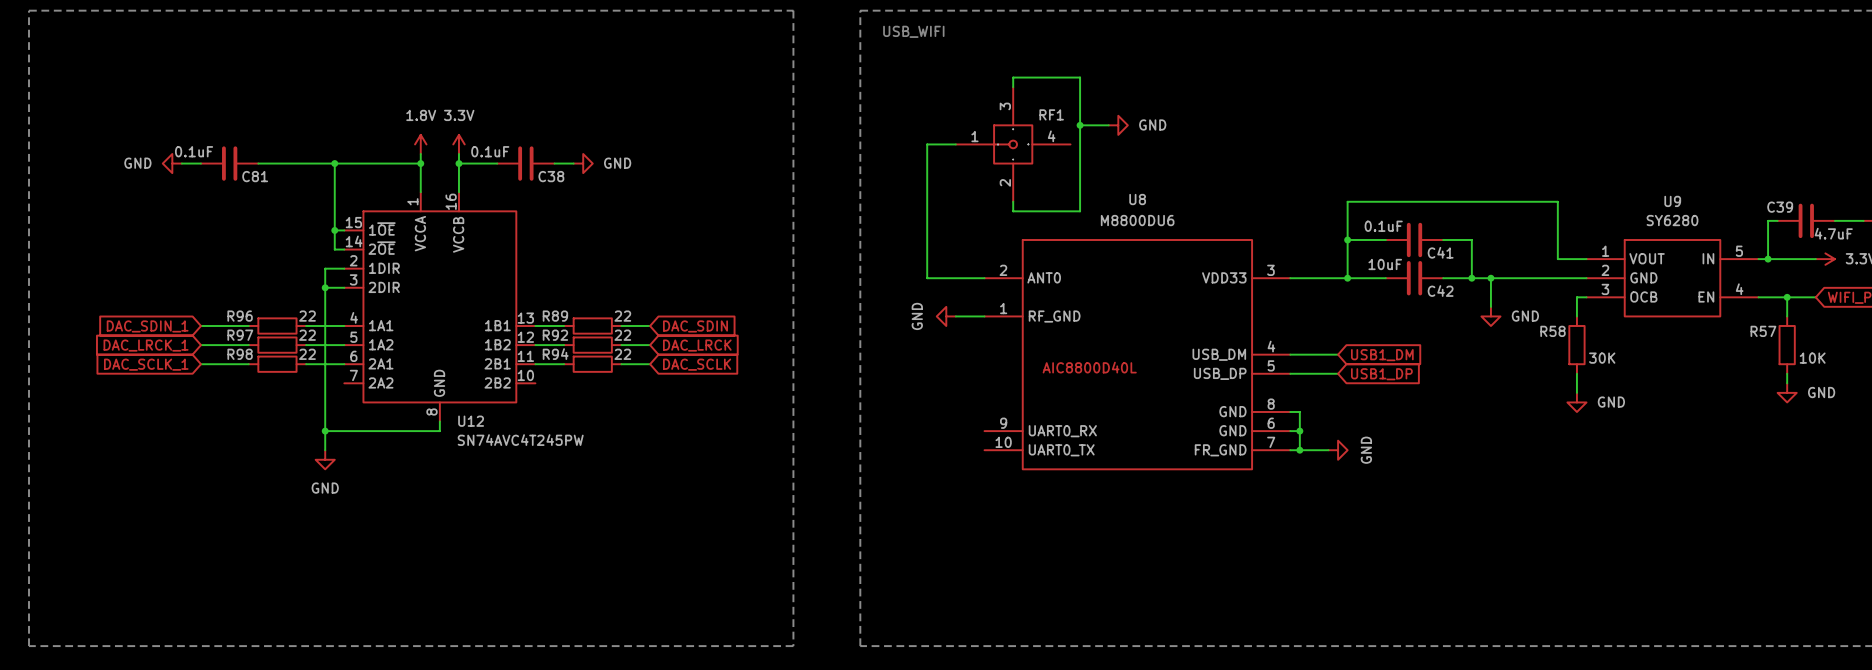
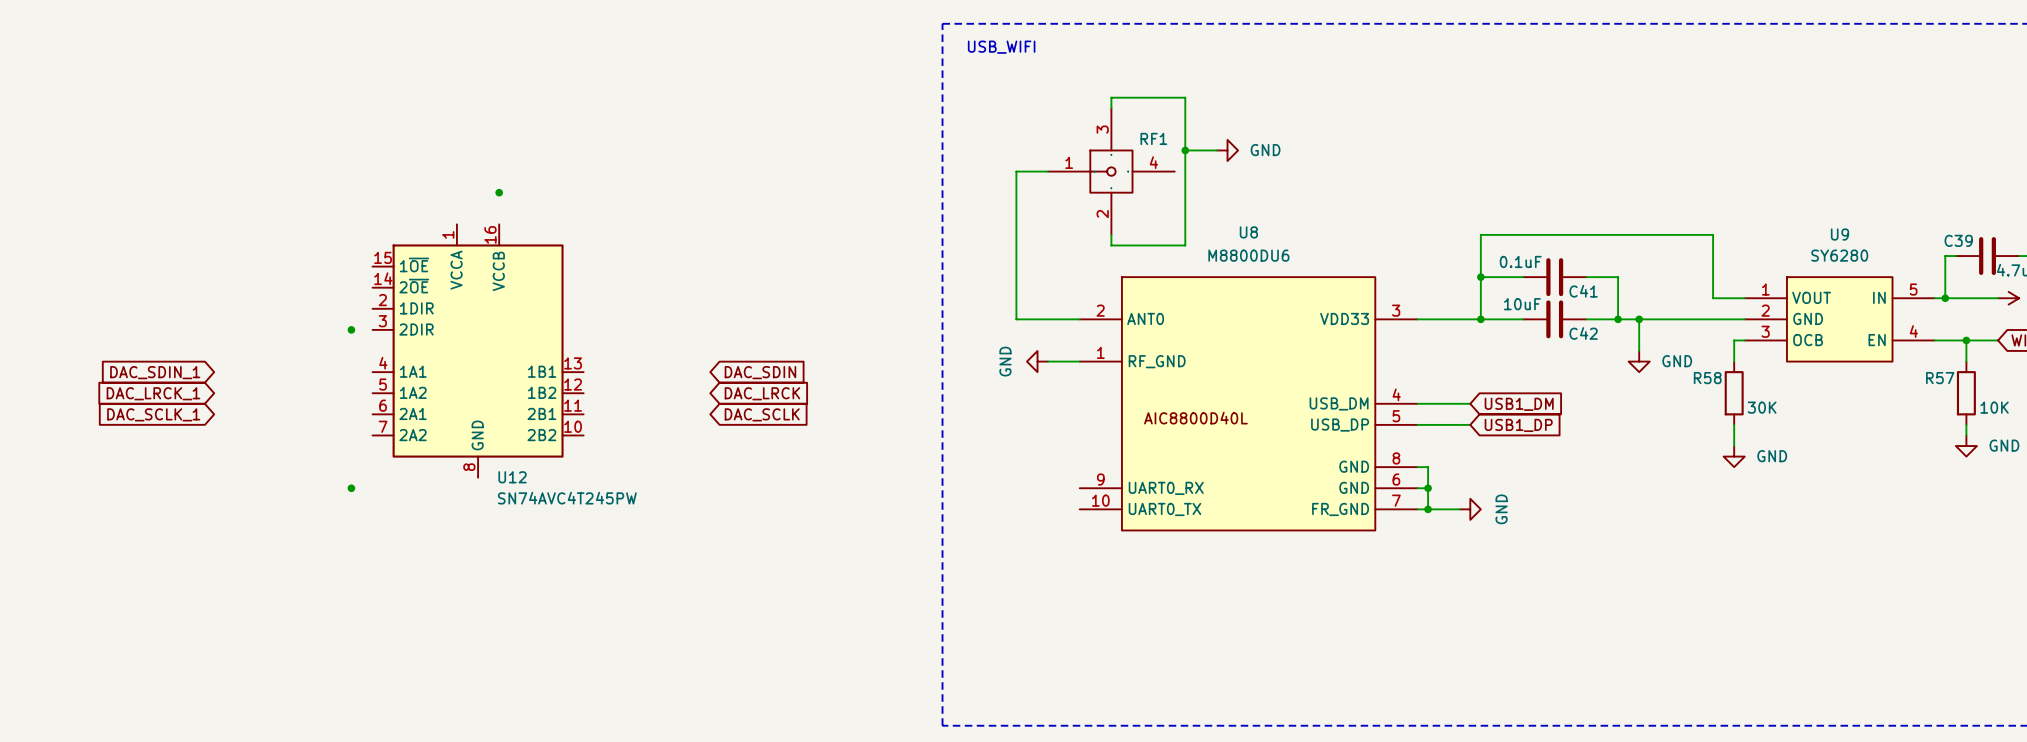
line: (29, 10) (793, 10) (793, 646) (29, 646) (29, 10) -> none
power symbol: 1.8V (420, 144) -> none
power symbol: 3.3V (458, 144) -> none
wire: (420, 154) (420, 192) -> none
wire: (458, 154) (458, 192) -> none
power symbol: GND (172, 163) -> none
wire: (181, 163) (200, 163) -> none
C81: 0.1uF (229, 163) -> none
wire: (258, 163) (420, 163) -> none
wire: (334, 163) (334, 249) (344, 249) -> none
junction: (334, 163) -> none
junction: (420, 163) -> none
wire: (458, 163) (497, 163) -> none
C38: 0.1uF (525, 163) -> none
wire: (554, 163) (573, 163) -> none
power symbol: GND (583, 163) -> none
wire: (334, 230) (344, 230) -> none
junction: (334, 230) -> none
wire: (344, 268) (325, 268) (325, 450) -> none
wire: (325, 287) (344, 287) -> none
wire: (200, 325) (248, 325) -> none
R96: 22 (277, 325) -> none
wire: (306, 325) (344, 325) -> none
wire: (535, 325) (564, 325) -> none
R89: 22 (592, 325) -> none
wire: (621, 325) (650, 325) -> none
wire: (200, 345) (248, 345) -> none
R97: 22 (277, 345) -> none
wire: (306, 345) (344, 345) -> none
wire: (535, 345) (564, 345) -> none
R92: 22 (592, 345) -> none
wire: (621, 345) (650, 345) -> none
wire: (200, 364) (248, 364) -> none
R98: 22 (277, 364) -> none
wire: (306, 364) (344, 364) -> none
wire: (535, 364) (564, 364) -> none
R94: 22 (592, 364) -> none
wire: (621, 364) (650, 364) -> none
wire: (439, 421) (439, 431) (325, 431) -> none
power symbol: GND (325, 459) -> none

